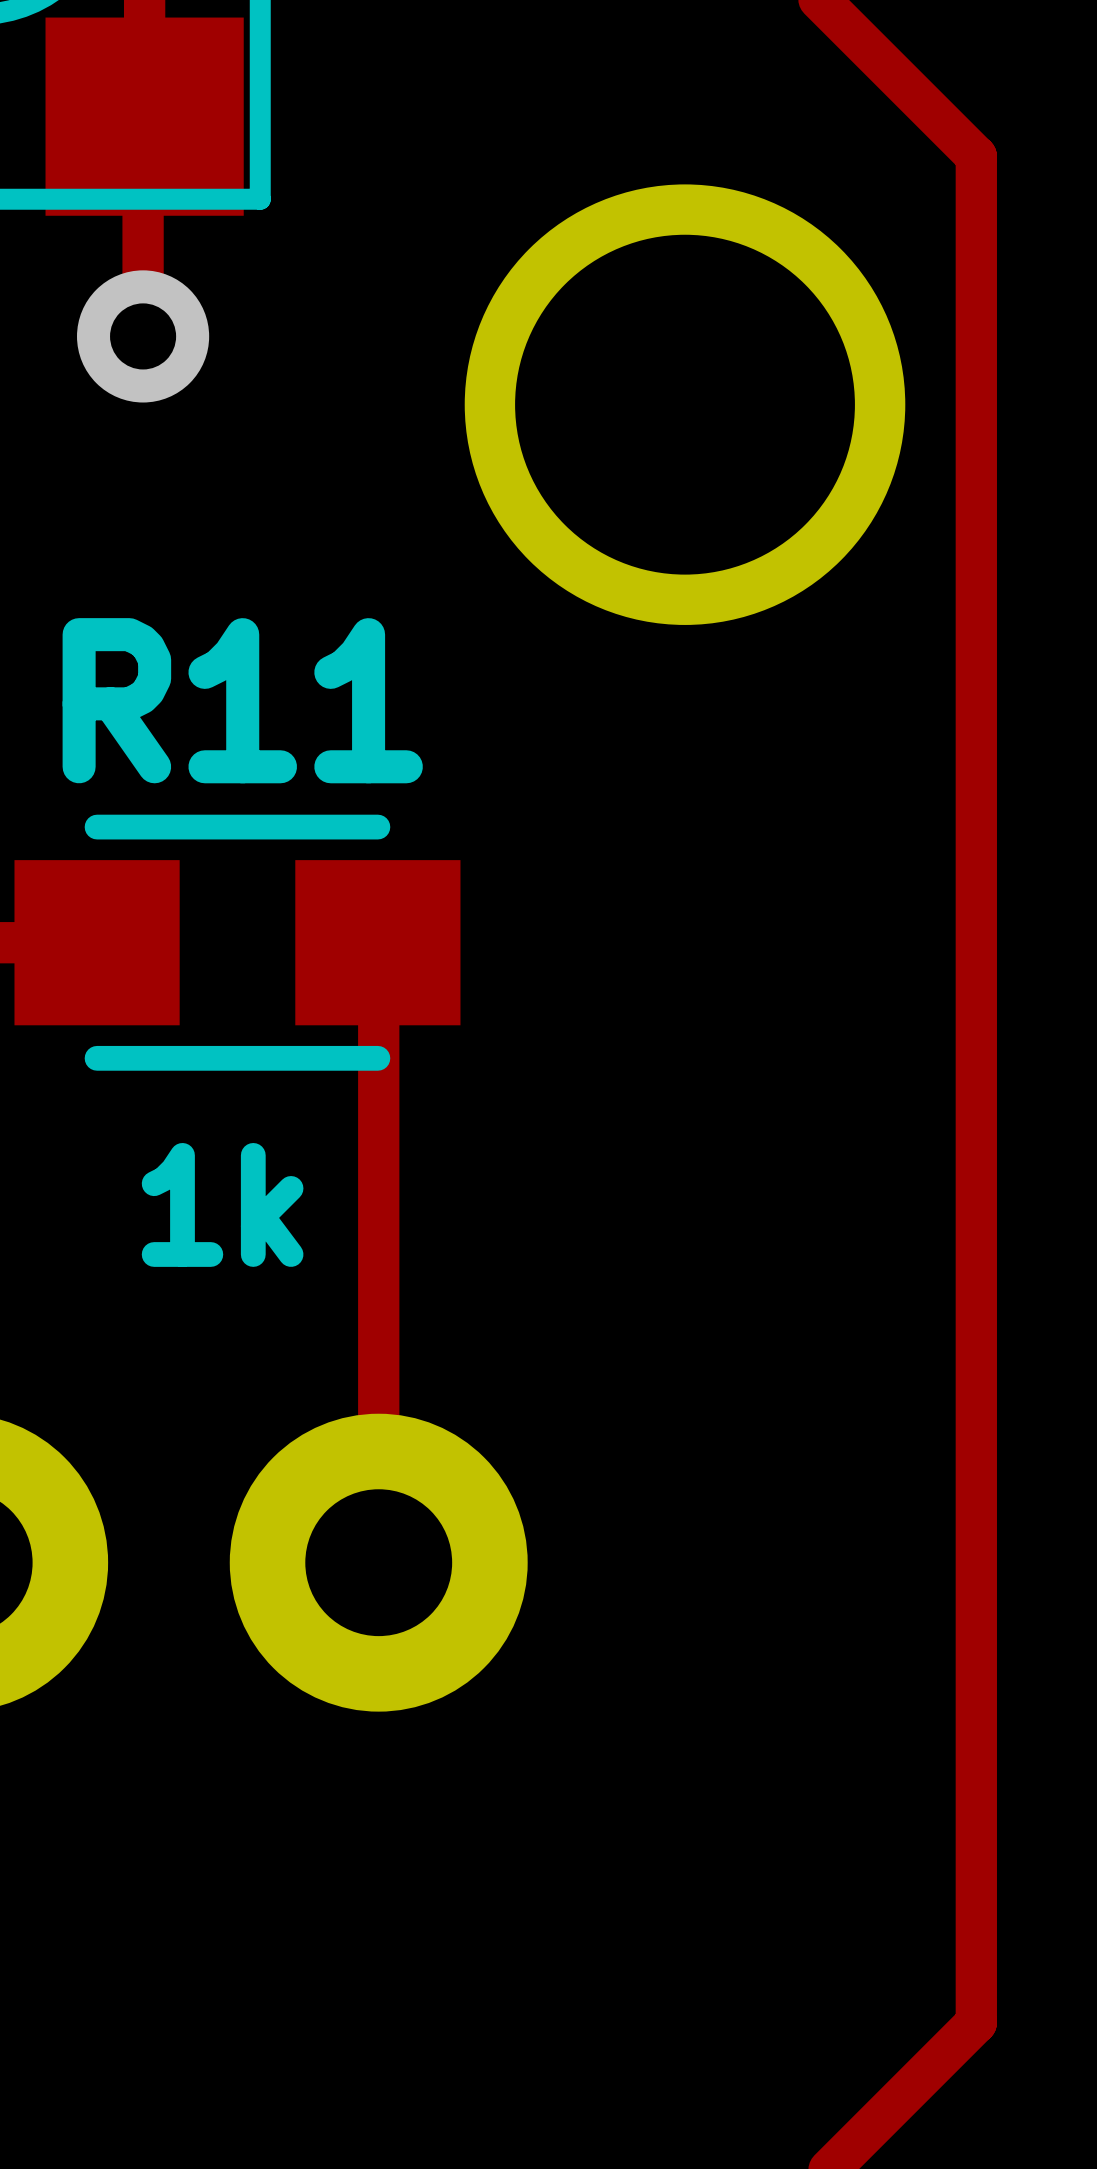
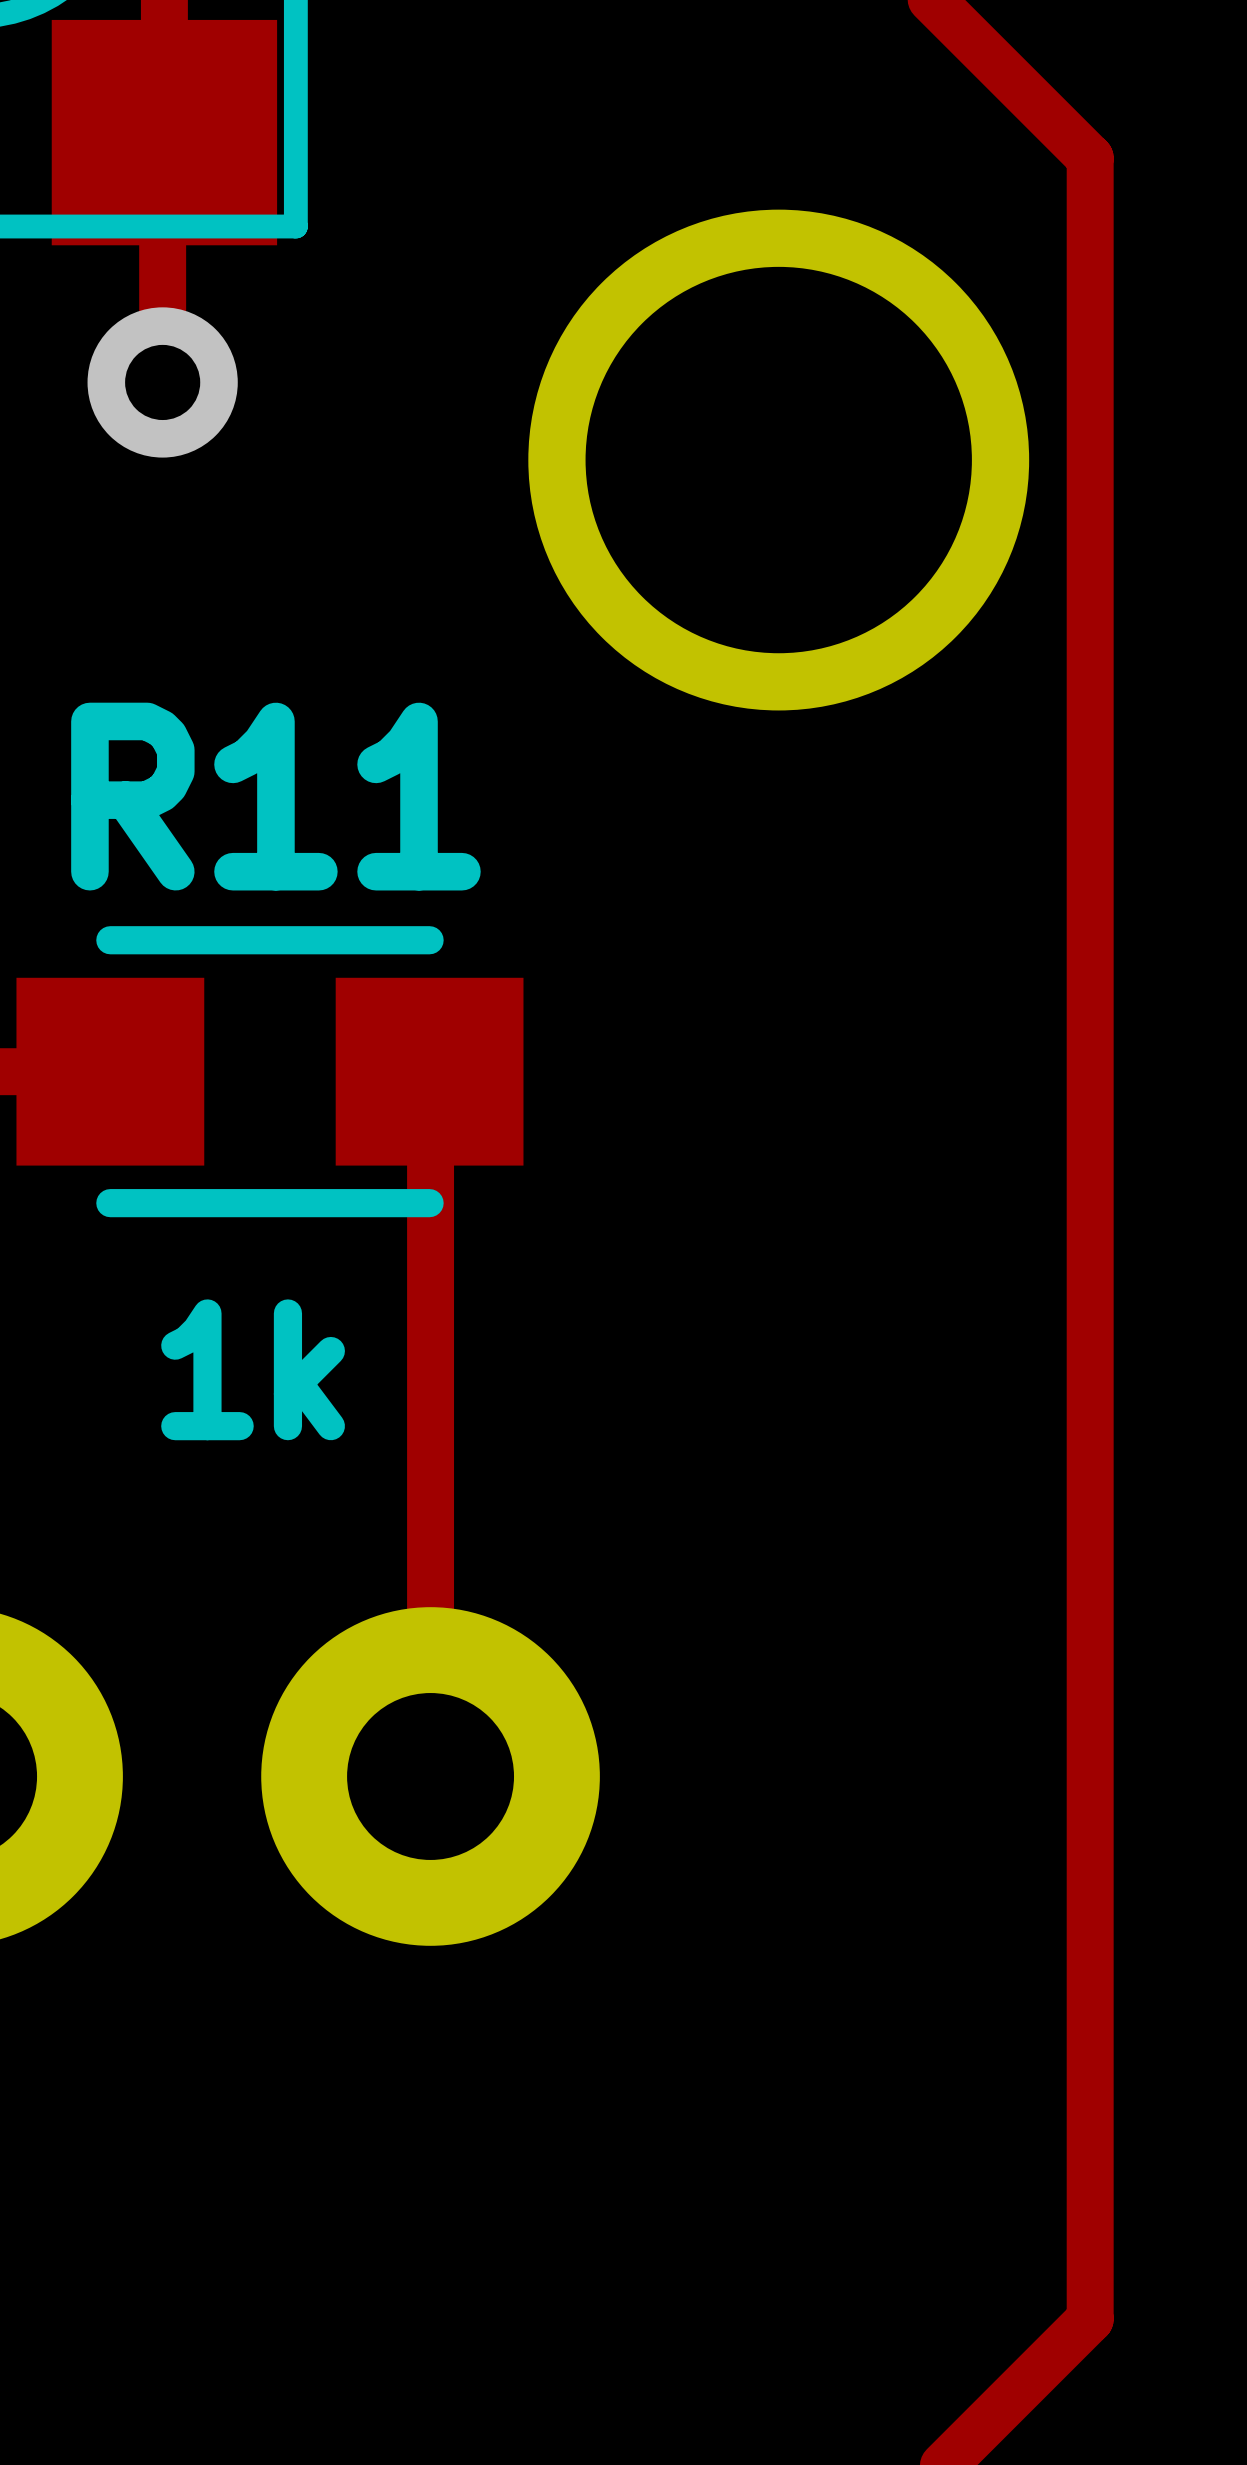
track: (958, 139) (976, 156) (976, 2022) (958, 2040) -> (1090, 158) (1090, 2319)

